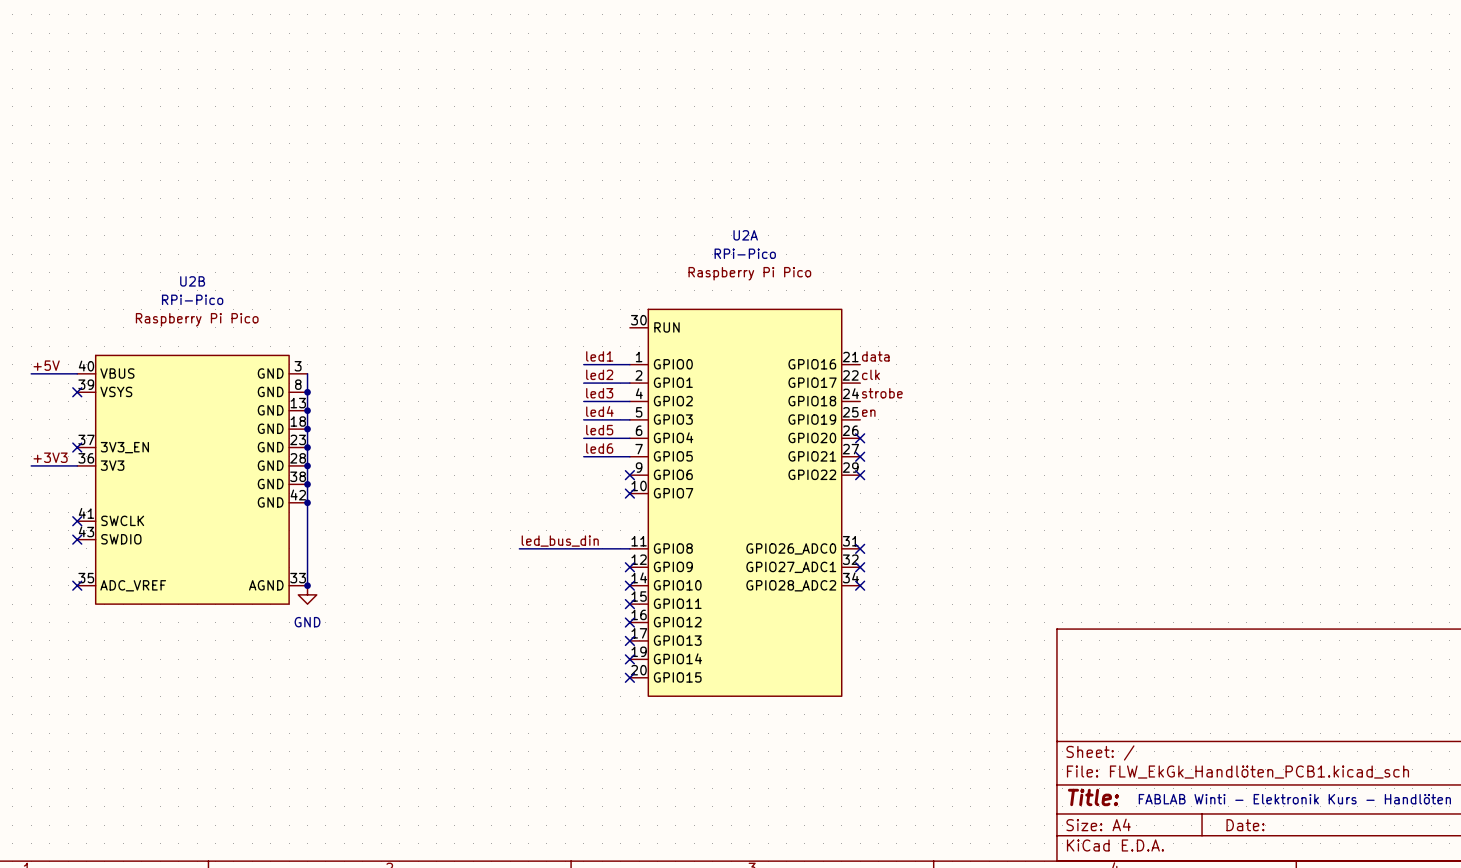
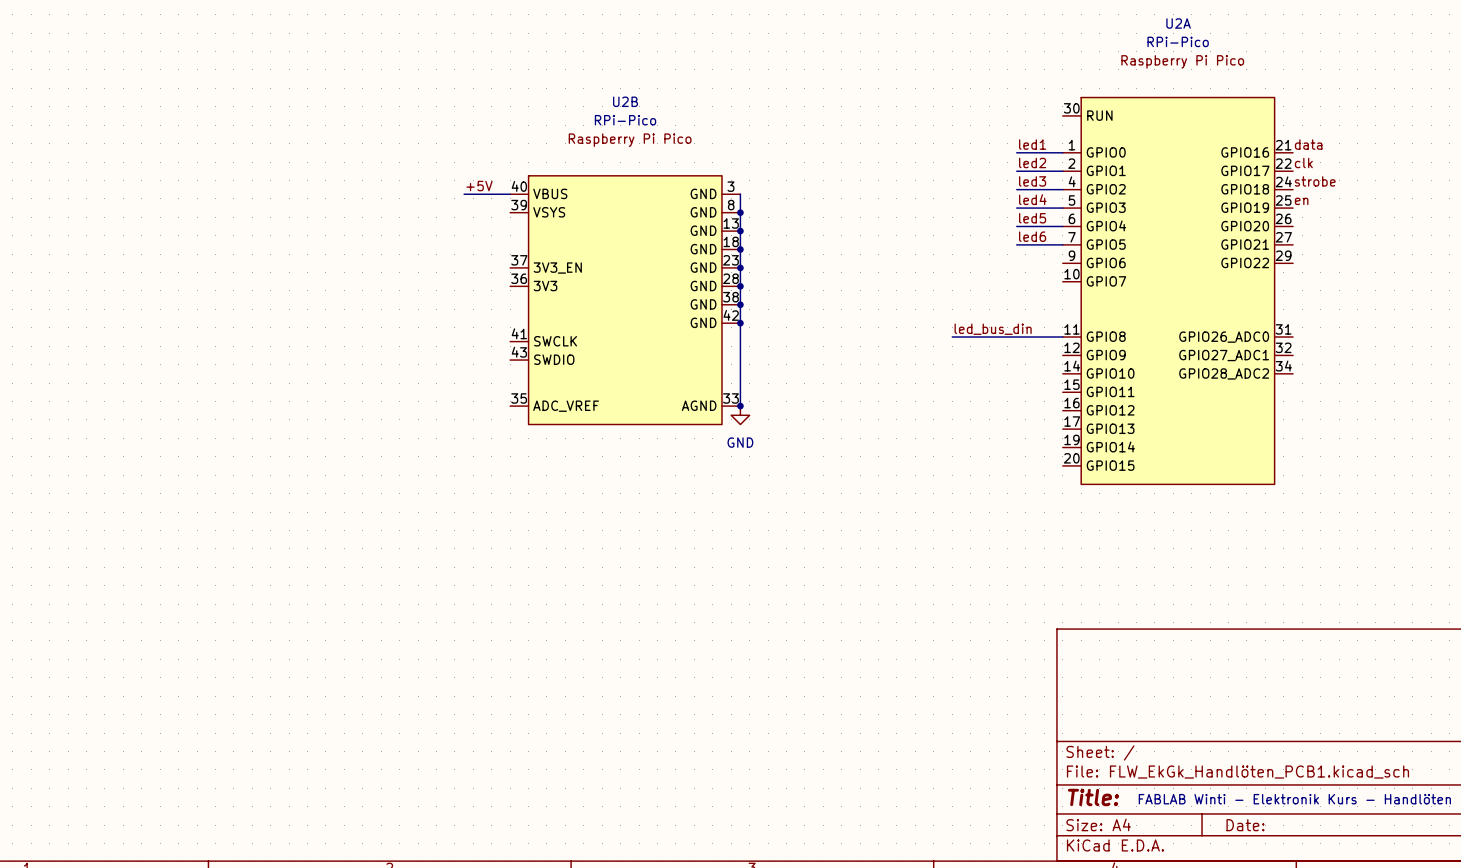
label: none -> led1 (1032, 144)
label: none -> data (1308, 144)
wire: none -> (1016, 152) (1062, 152)
label: none -> led2 (1032, 163)
label: none -> clk (1303, 163)
wire: none -> (1016, 171) (1062, 171)
label: none -> led3 (1032, 181)
label: none -> strobe (1315, 181)
label: none -> +5V (479, 186)
wire: none -> (1016, 189) (1062, 189)
wire: none -> (464, 194) (510, 194)
wire: none -> (740, 194) (740, 406)
label: none -> led4 (1032, 199)
label: none -> en (1301, 201)
wire: none -> (1016, 208) (1062, 208)
junction: none -> (740, 212)
label: none -> led5 (1032, 218)
wire: none -> (1016, 226) (1062, 226)
junction: none -> (740, 231)
label: none -> led6 (1032, 236)
wire: none -> (1016, 244) (1062, 244)
junction: none -> (740, 249)
junction: none -> (740, 267)
junction: none -> (740, 286)
junction: none -> (740, 304)
junction: none -> (740, 323)
label: none -> led_bus_din (993, 329)
wire: none -> (952, 337) (1062, 337)
label: led1 (599, 356) -> none
label: data (875, 356) -> none
label: +5V (46, 365) -> none
wire: (31, 373) (77, 373) -> none
wire: (307, 373) (307, 585) -> none
label: led2 (599, 374) -> none
label: clk (870, 374) -> none
no-connect mark: (77, 392) -> none
junction: (307, 392) -> none
label: led3 (599, 393) -> none
label: strobe (882, 393) -> none
junction: none -> (740, 406)
junction: (307, 410) -> none
label: led4 (599, 411) -> none
label: en (868, 413) -> none
power symbol: none -> GND (740, 415)
junction: (307, 429) -> none
label: led5 (599, 430) -> none
wire: (583, 438) (629, 438) -> none
no-connect mark: (860, 438) -> none
no-connect mark: (77, 447) -> none
junction: (307, 447) -> none
label: led6 (599, 448) -> none
wire: (583, 456) (629, 456) -> none
no-connect mark: (860, 456) -> none
label: +3V3 (50, 457) -> none
wire: (31, 465) (77, 465) -> none
junction: (307, 465) -> none
no-connect mark: (629, 475) -> none
no-connect mark: (860, 475) -> none
U2B position: (192, 479) -> (625, 300)
junction: (307, 484) -> none
no-connect mark: (629, 493) -> none
junction: (307, 502) -> none
U2A position: (745, 502) -> (1177, 290)
no-connect mark: (77, 521) -> none
no-connect mark: (77, 539) -> none
label: led_bus_din (560, 541) -> none
wire: (519, 548) (629, 548) -> none
no-connect mark: (860, 548) -> none
no-connect mark: (629, 567) -> none
no-connect mark: (860, 567) -> none
no-connect mark: (77, 585) -> none
junction: (307, 585) -> none
no-connect mark: (629, 585) -> none
no-connect mark: (860, 585) -> none
power symbol: GND (307, 594) -> none
no-connect mark: (629, 604) -> none
no-connect mark: (629, 622) -> none
no-connect mark: (629, 640) -> none
no-connect mark: (629, 659) -> none
no-connect mark: (629, 677) -> none

